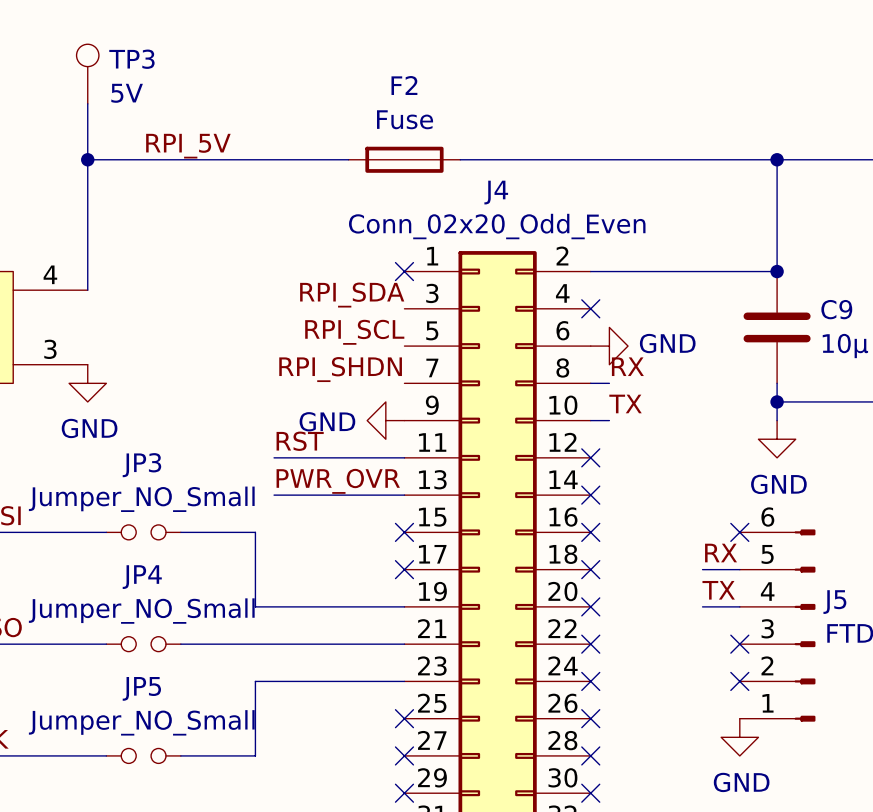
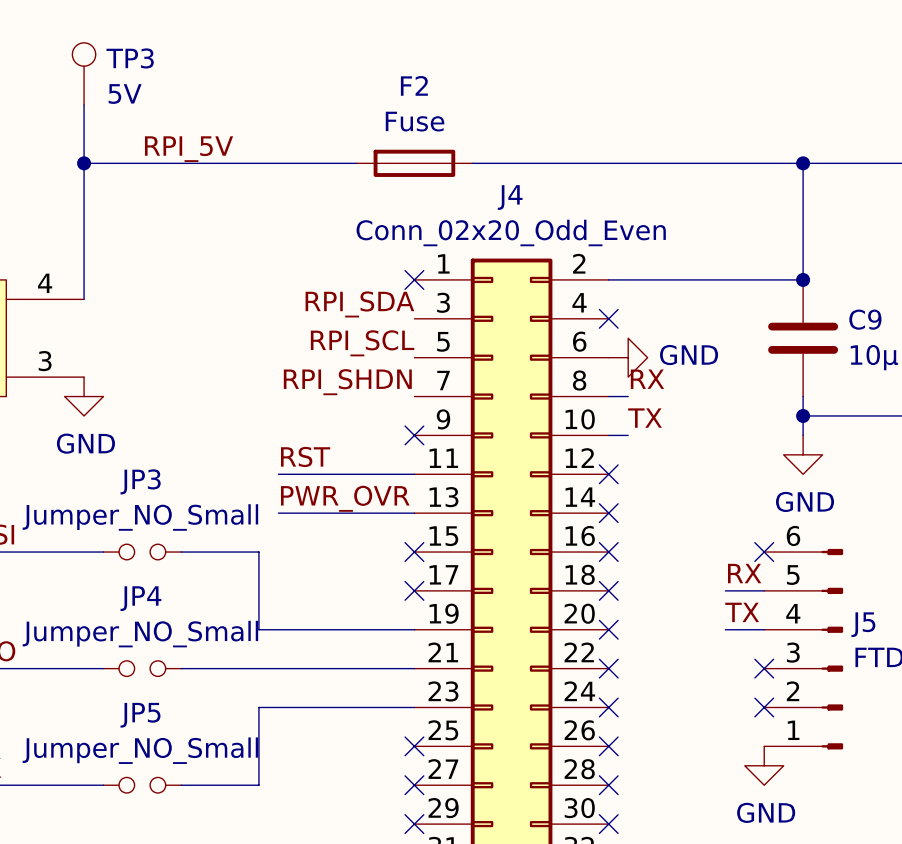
power symbol: GND (385, 420) -> none
no-connect mark: none -> (414, 435)

